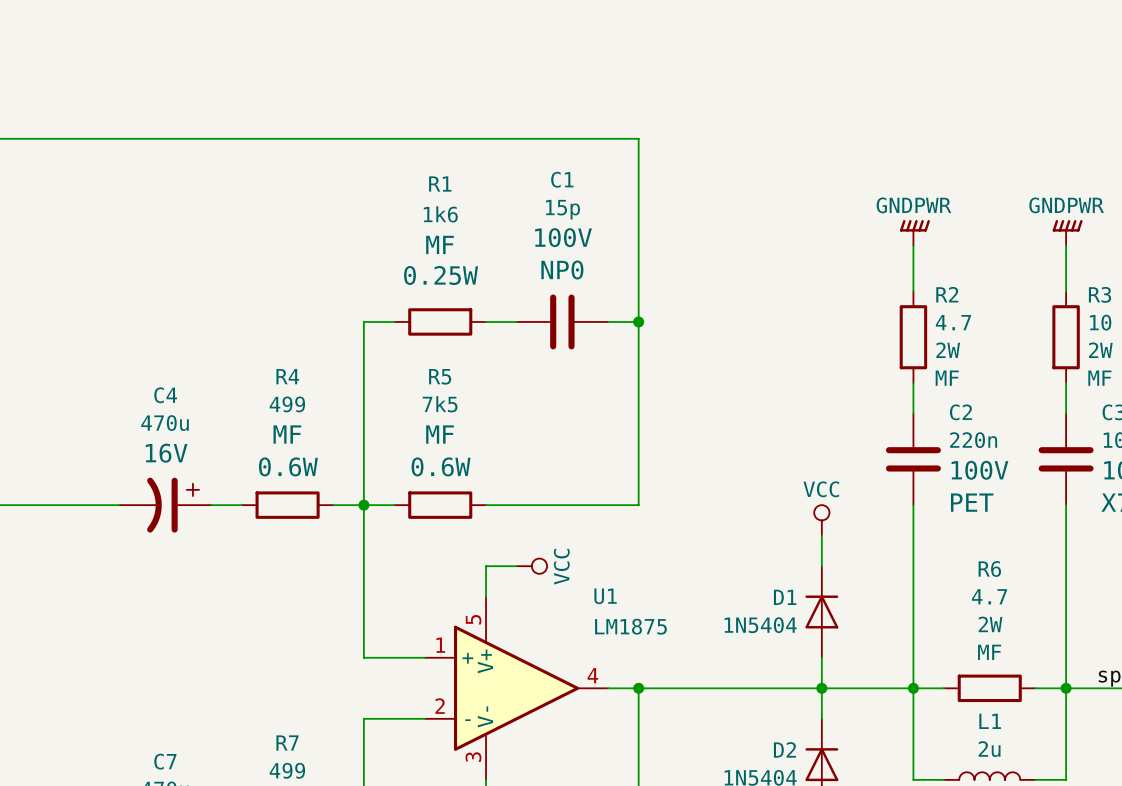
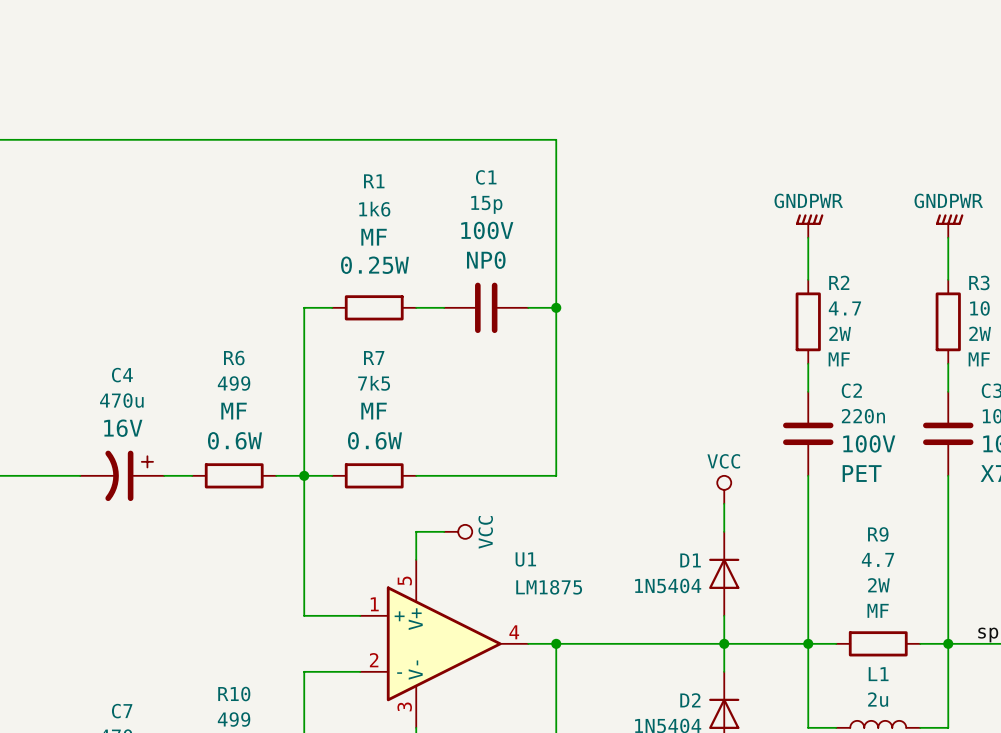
R4 name: R4 (287, 376) -> R6 (234, 358)
R5 name: R5 (440, 376) -> R7 (374, 358)
R6 name: R6 (989, 569) -> R9 (878, 534)
R7 name: R7 (287, 743) -> R10 (234, 694)

